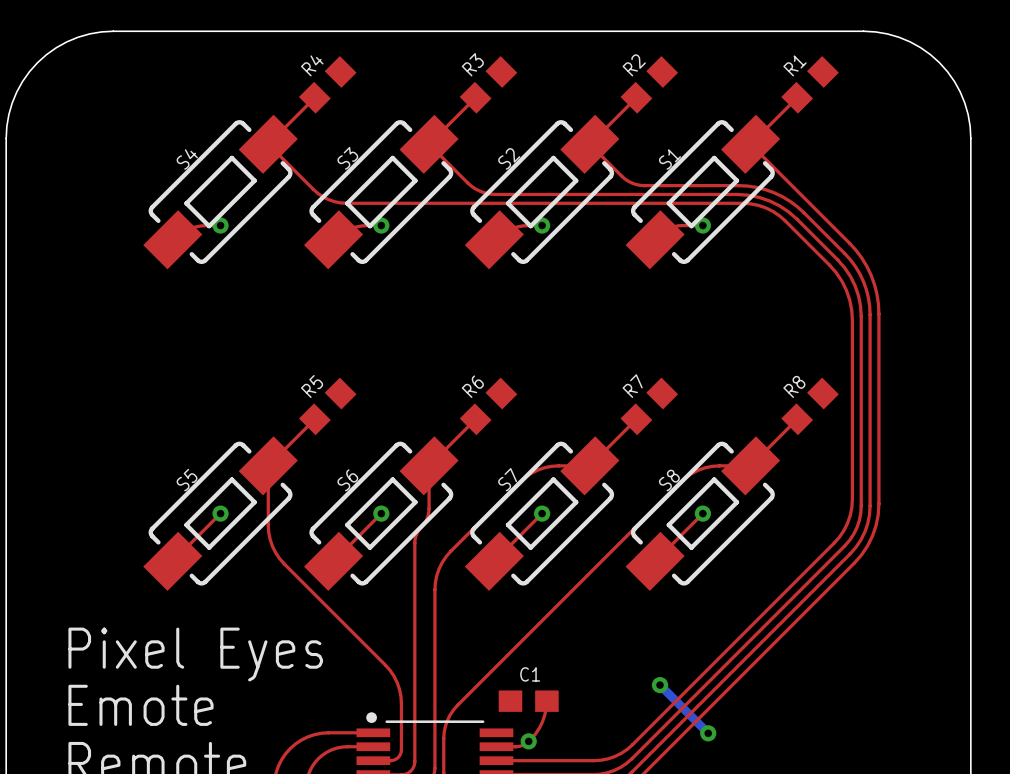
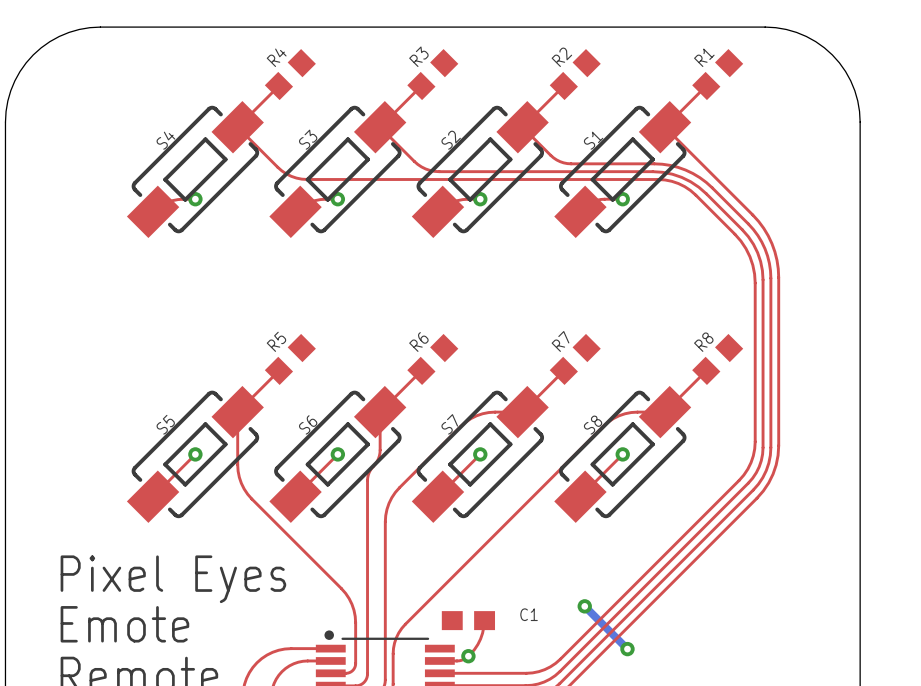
C1 name position: C1 (530, 674) -> C1 (529, 614)

